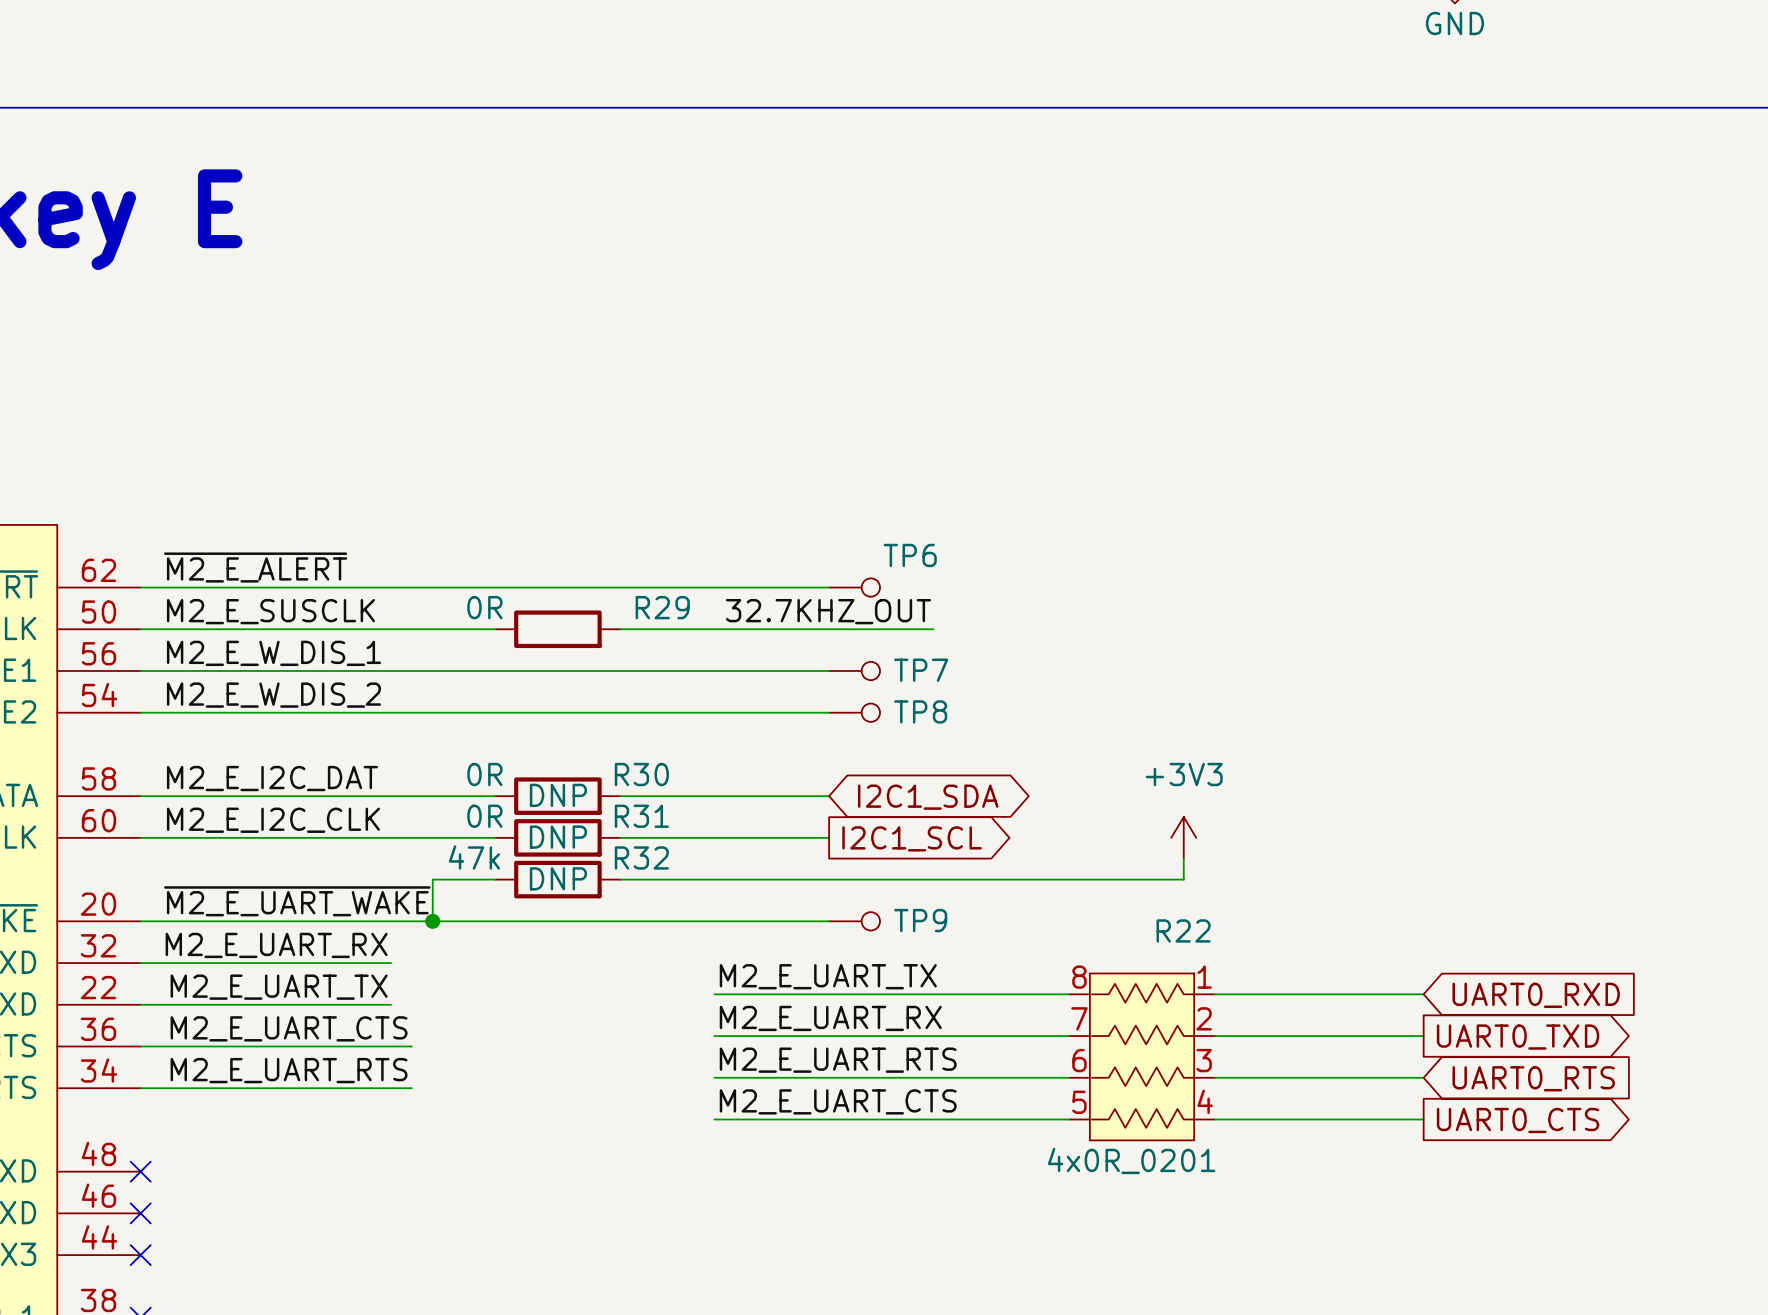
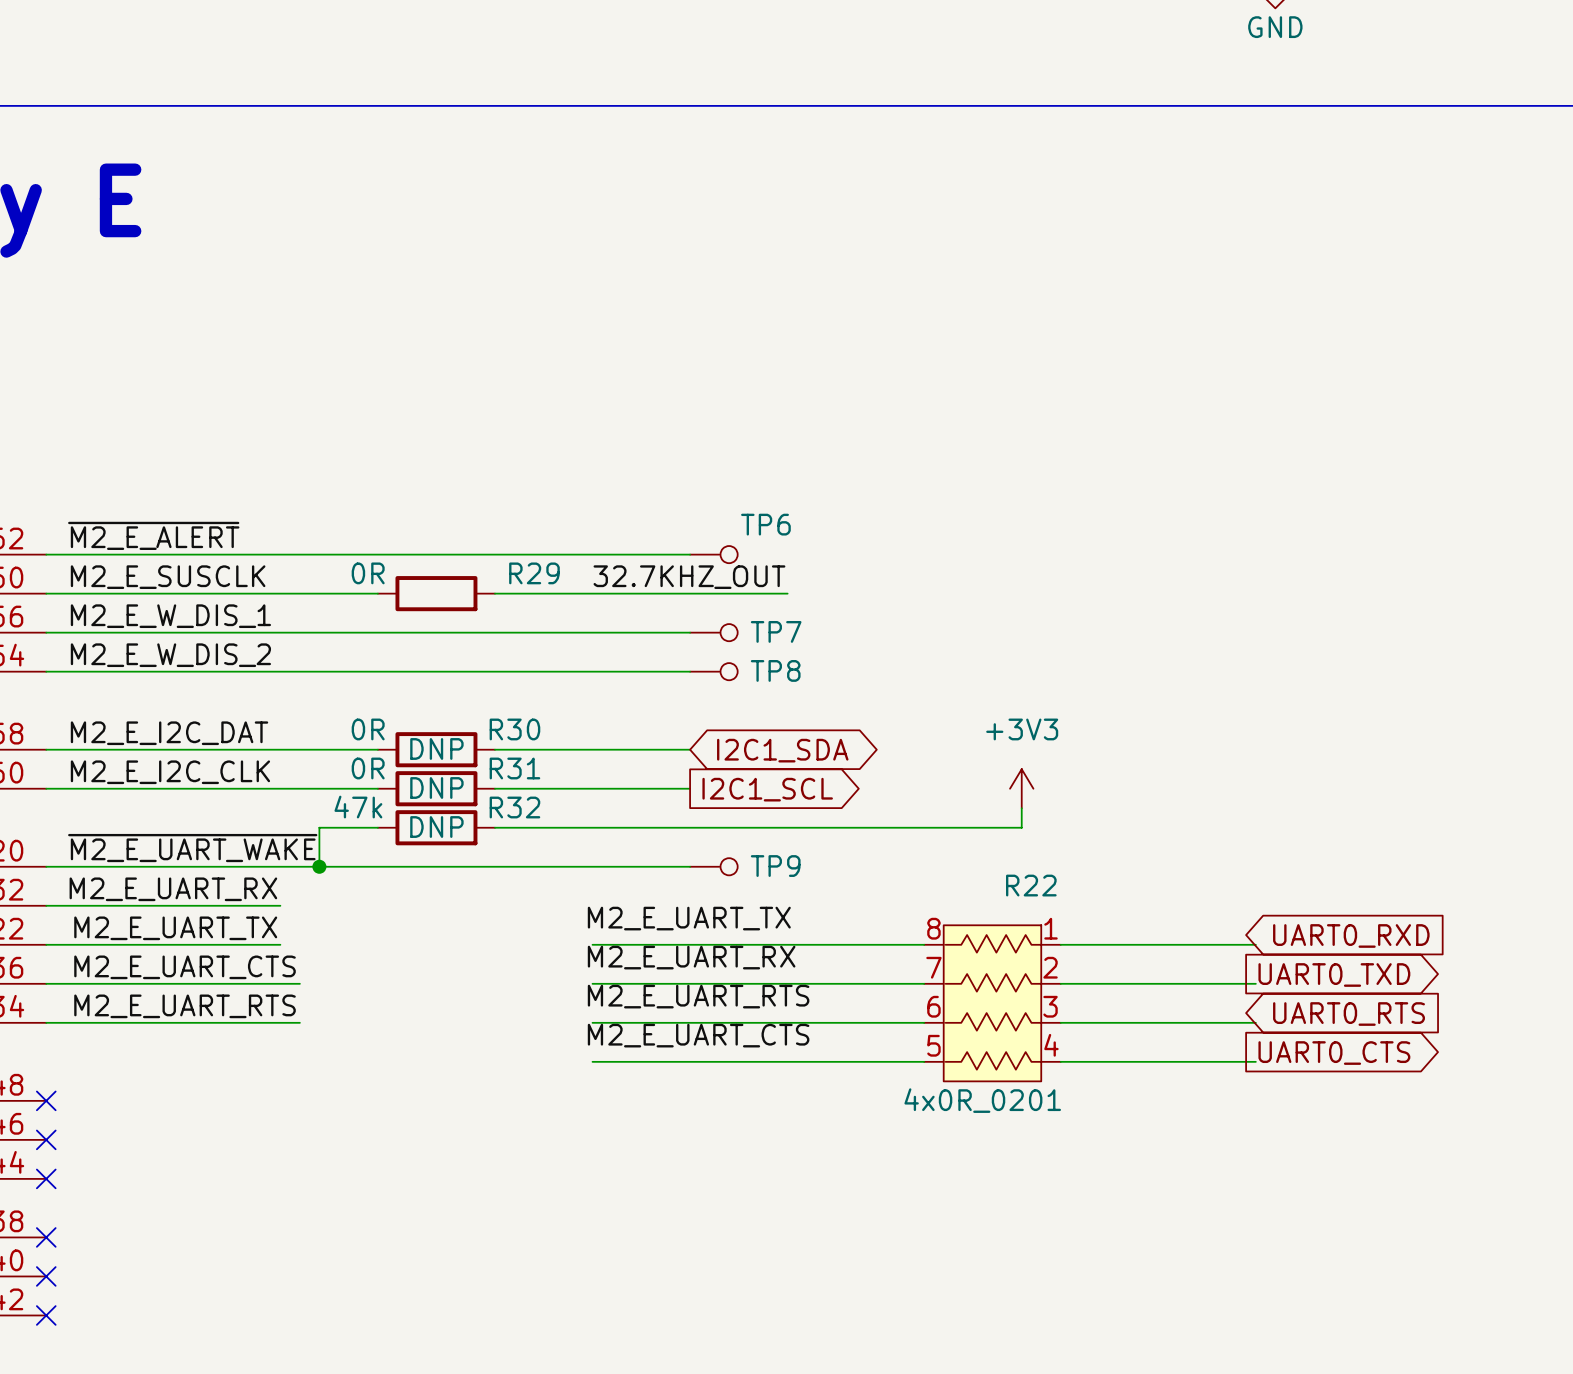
wire: (714, 994) (1069, 994) -> (592, 944) (924, 944)
wire: (1215, 994) (1423, 994) -> (1060, 944) (1255, 944)
wire: (714, 1036) (1069, 1036) -> (592, 983) (924, 983)
wire: (1215, 1036) (1423, 1036) -> (1060, 983) (1255, 983)
R22 position: (1142, 1056) -> (992, 1003)
wire: (714, 1077) (1069, 1077) -> (592, 1022) (924, 1022)
wire: (1215, 1077) (1423, 1077) -> (1060, 1022) (1255, 1022)
wire: (714, 1119) (1069, 1119) -> (592, 1061) (924, 1061)
wire: (1215, 1119) (1423, 1119) -> (1060, 1061) (1255, 1061)

